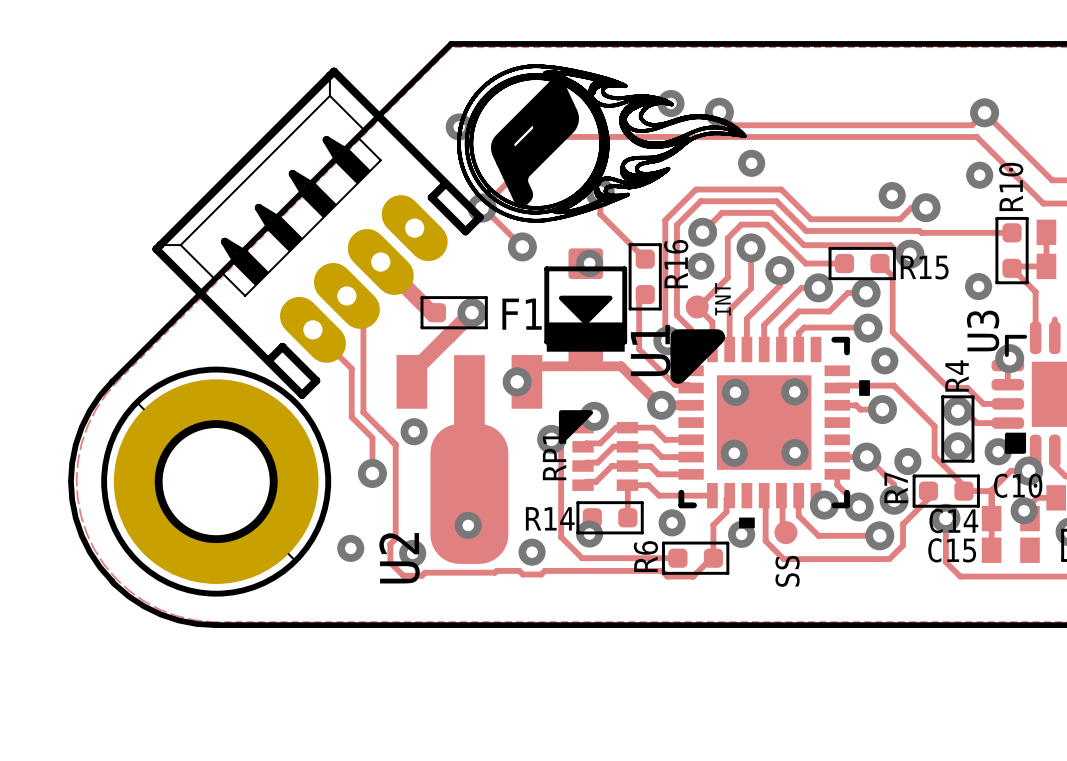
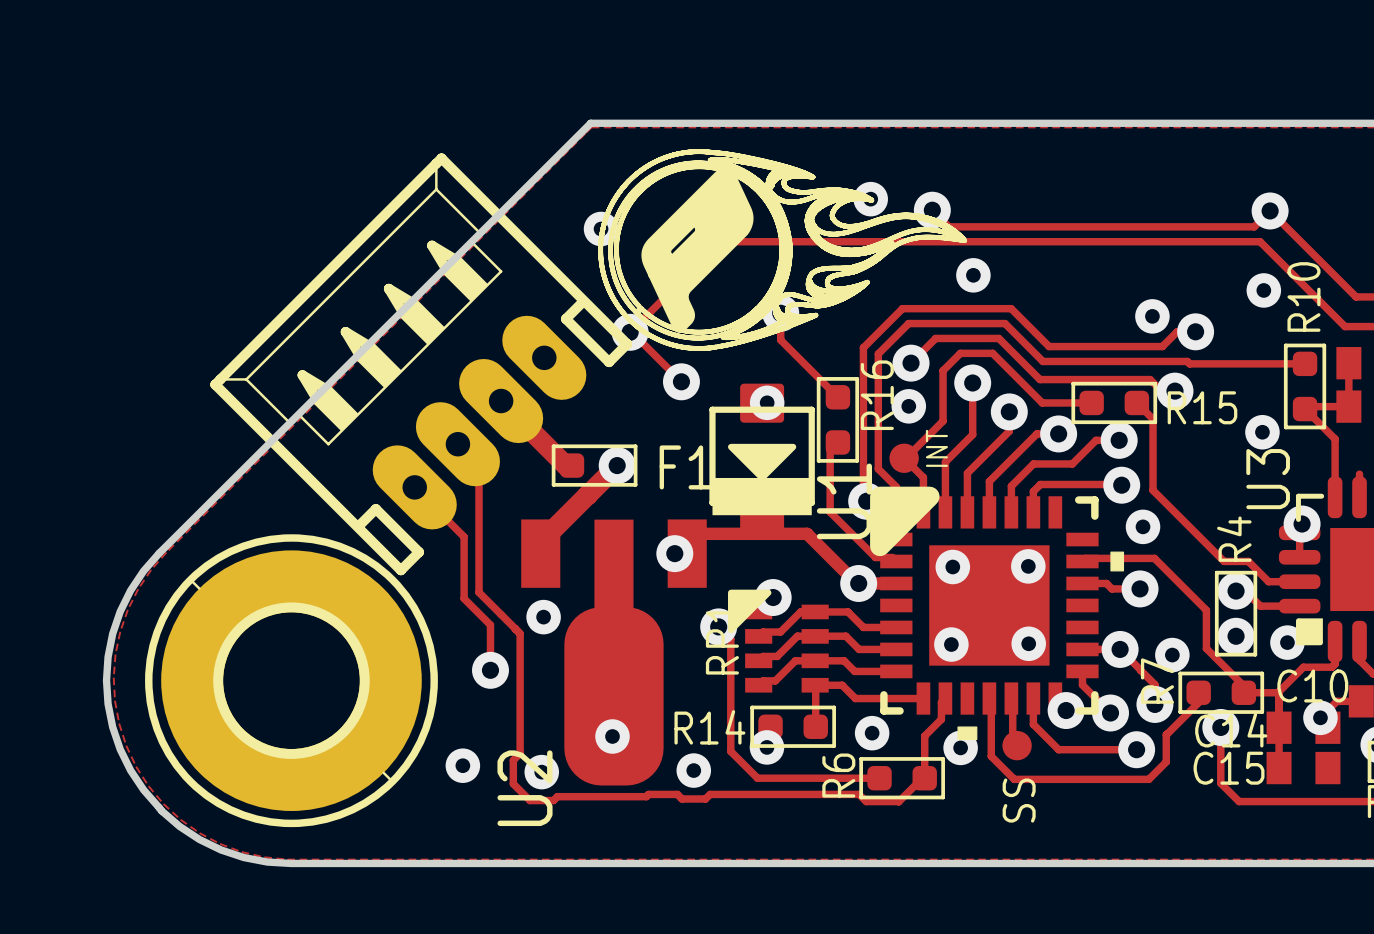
via: (1028, 471) -> none

